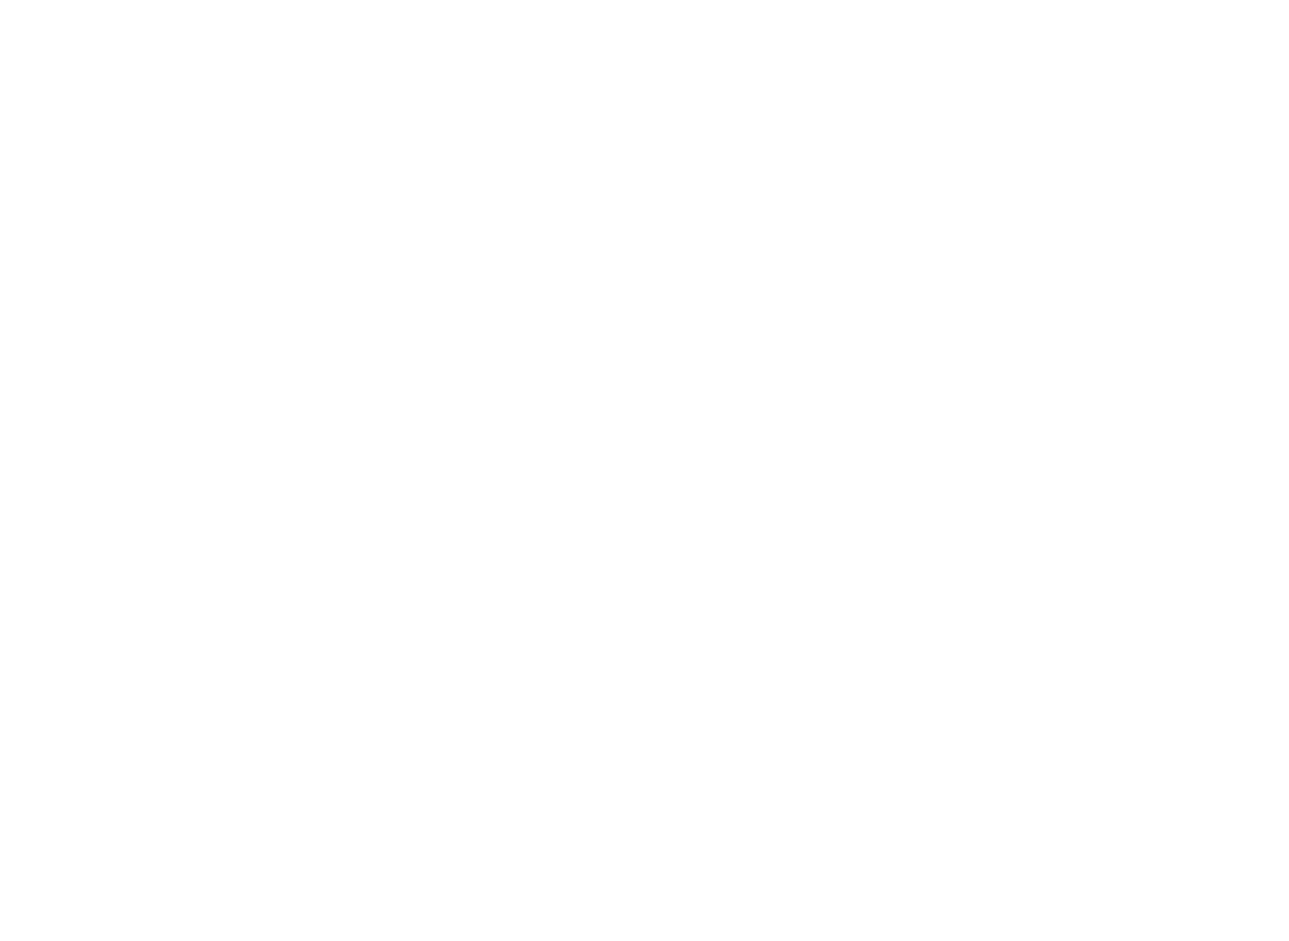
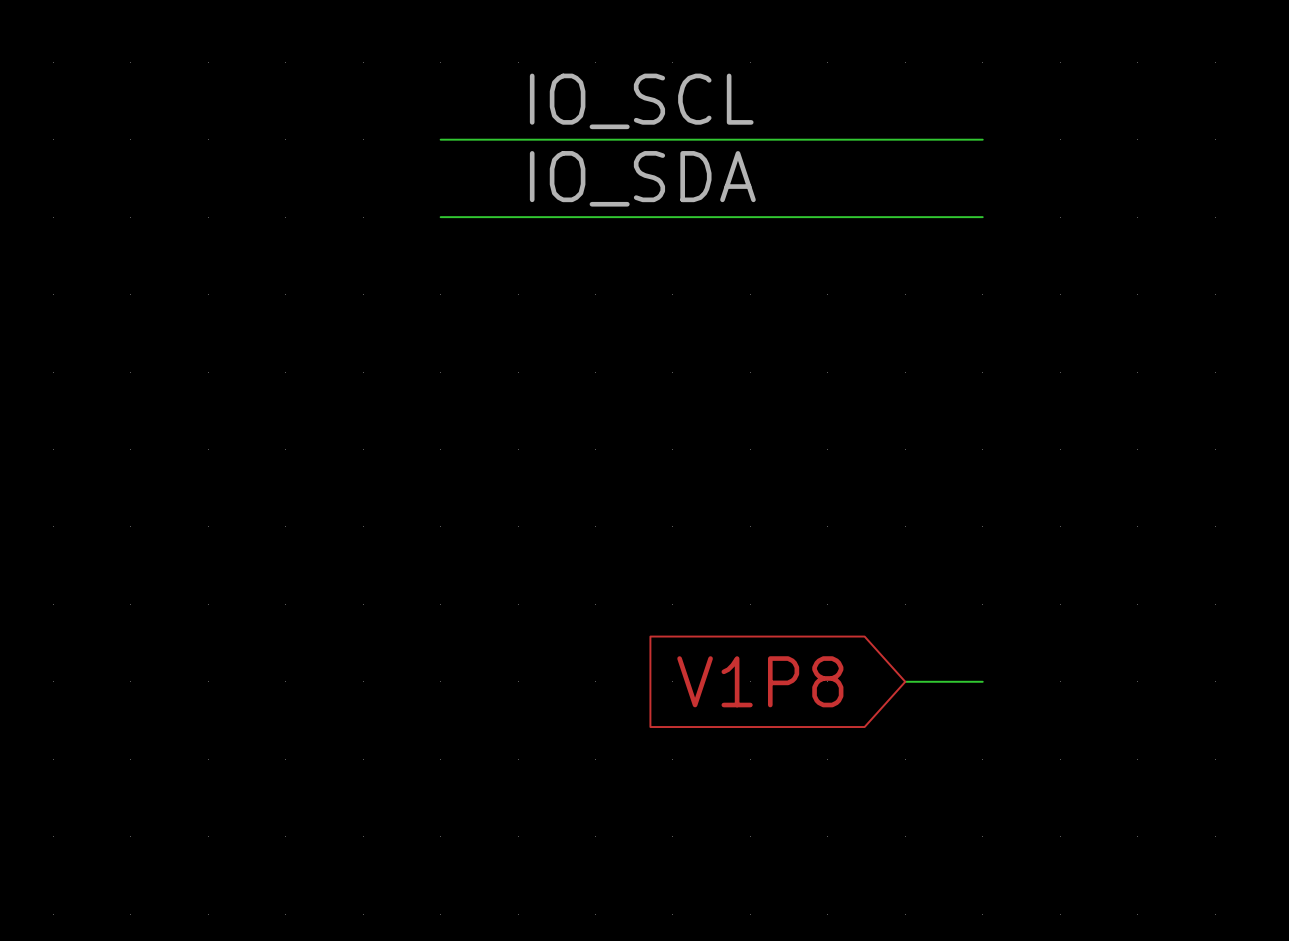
label: none -> IO_SCL (641, 101)
wire: none -> (440, 139) (982, 139)
label: none -> IO_SDA (642, 178)
wire: none -> (440, 217) (982, 217)
global label: none -> V1P8 (760, 681)
wire: none -> (905, 681) (982, 681)

